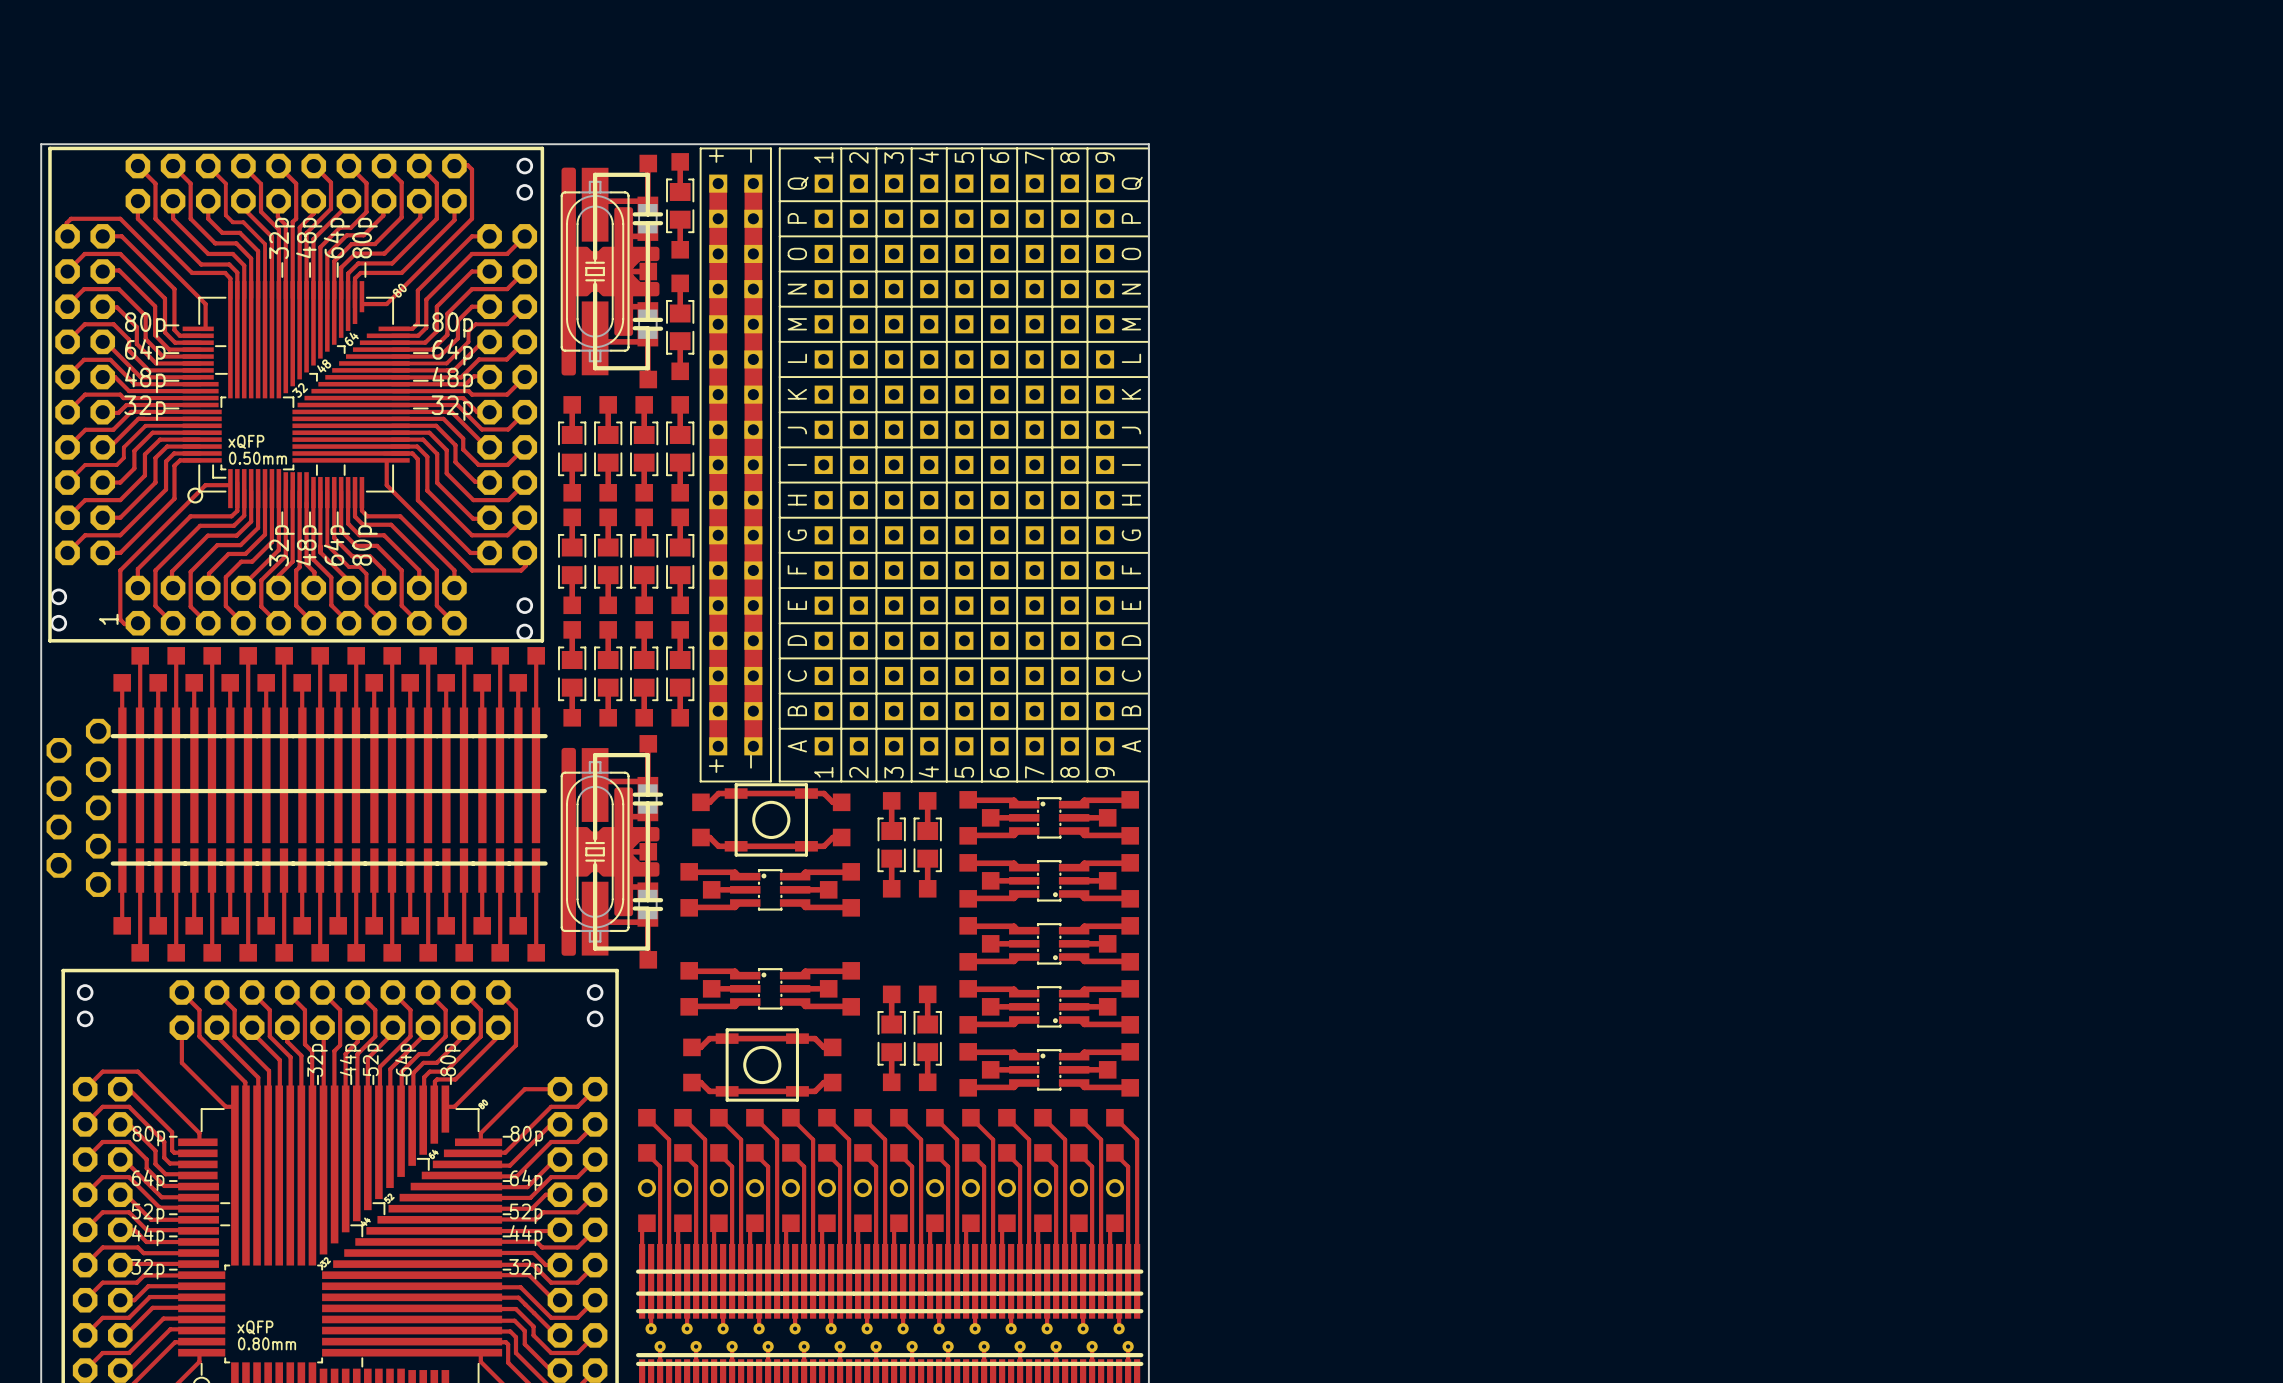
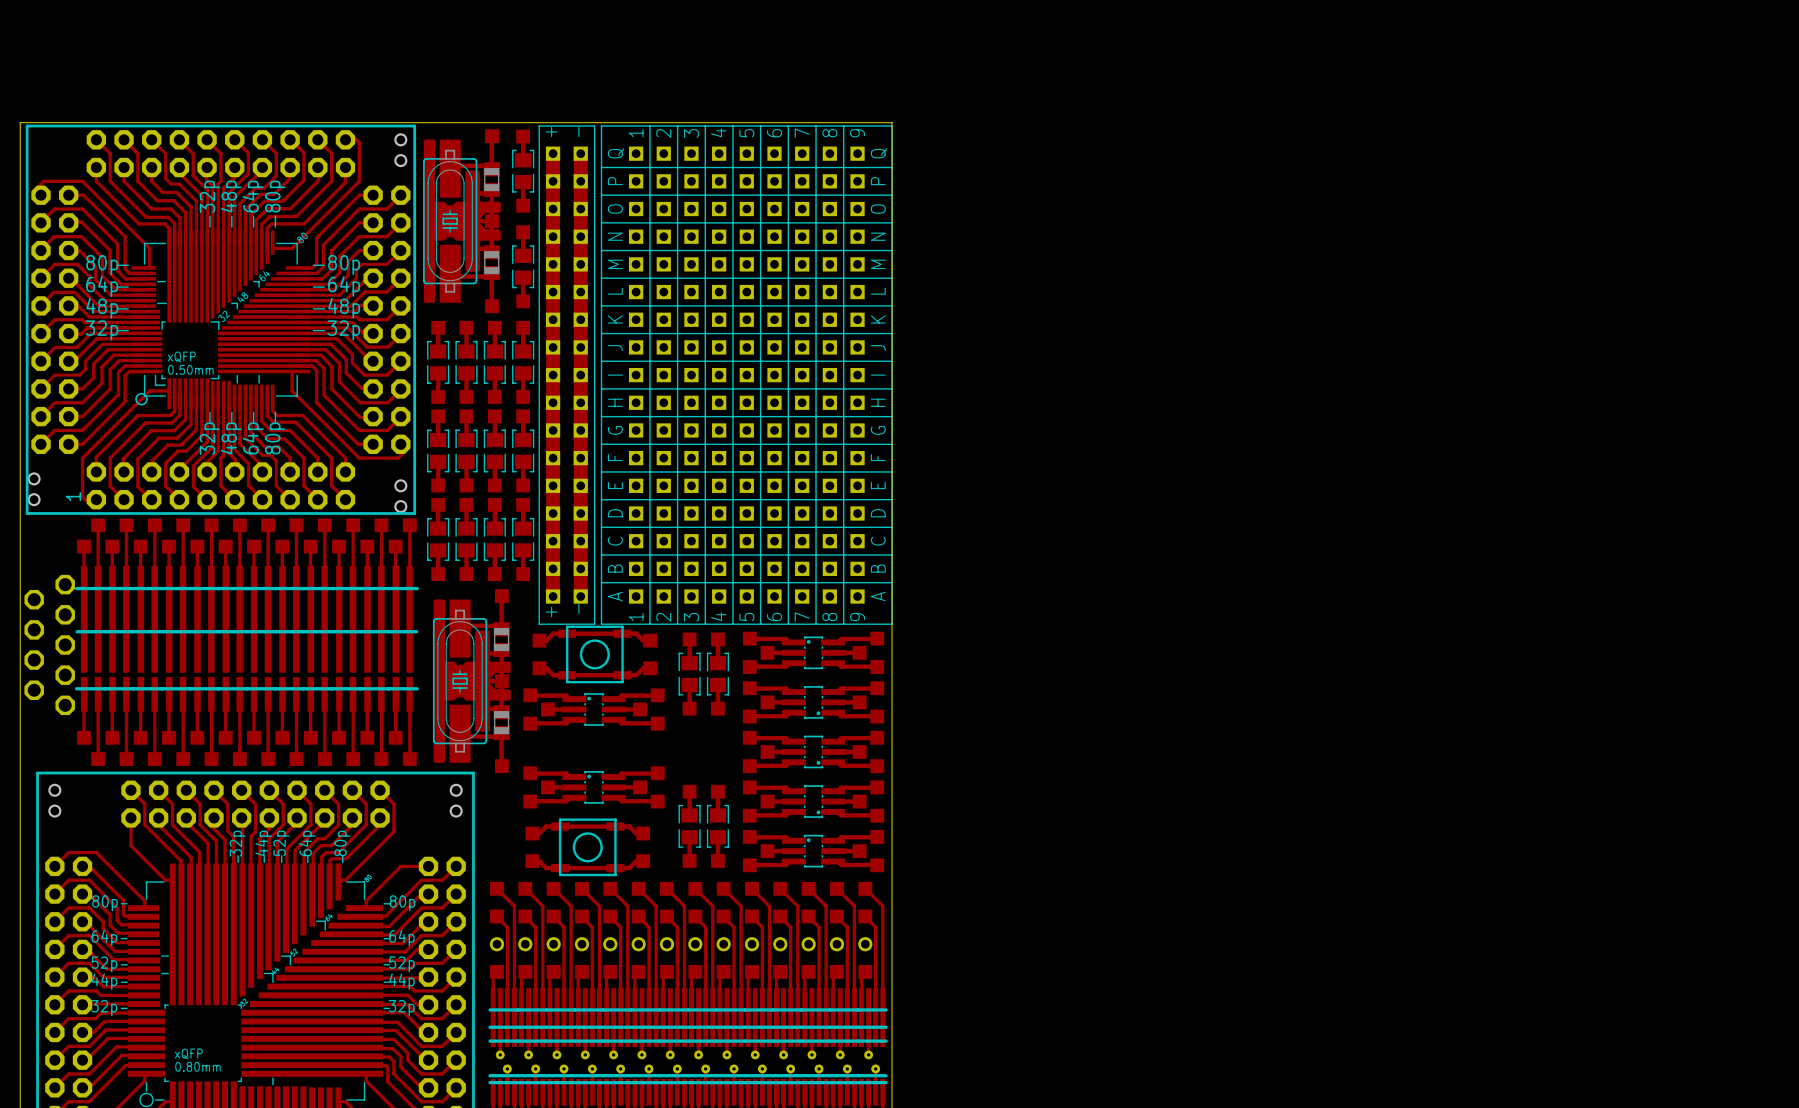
part footprint: [560, 154, 664, 389] -> [423, 129, 501, 314]
part footprint: [560, 735, 664, 969] -> [432, 589, 511, 774]

